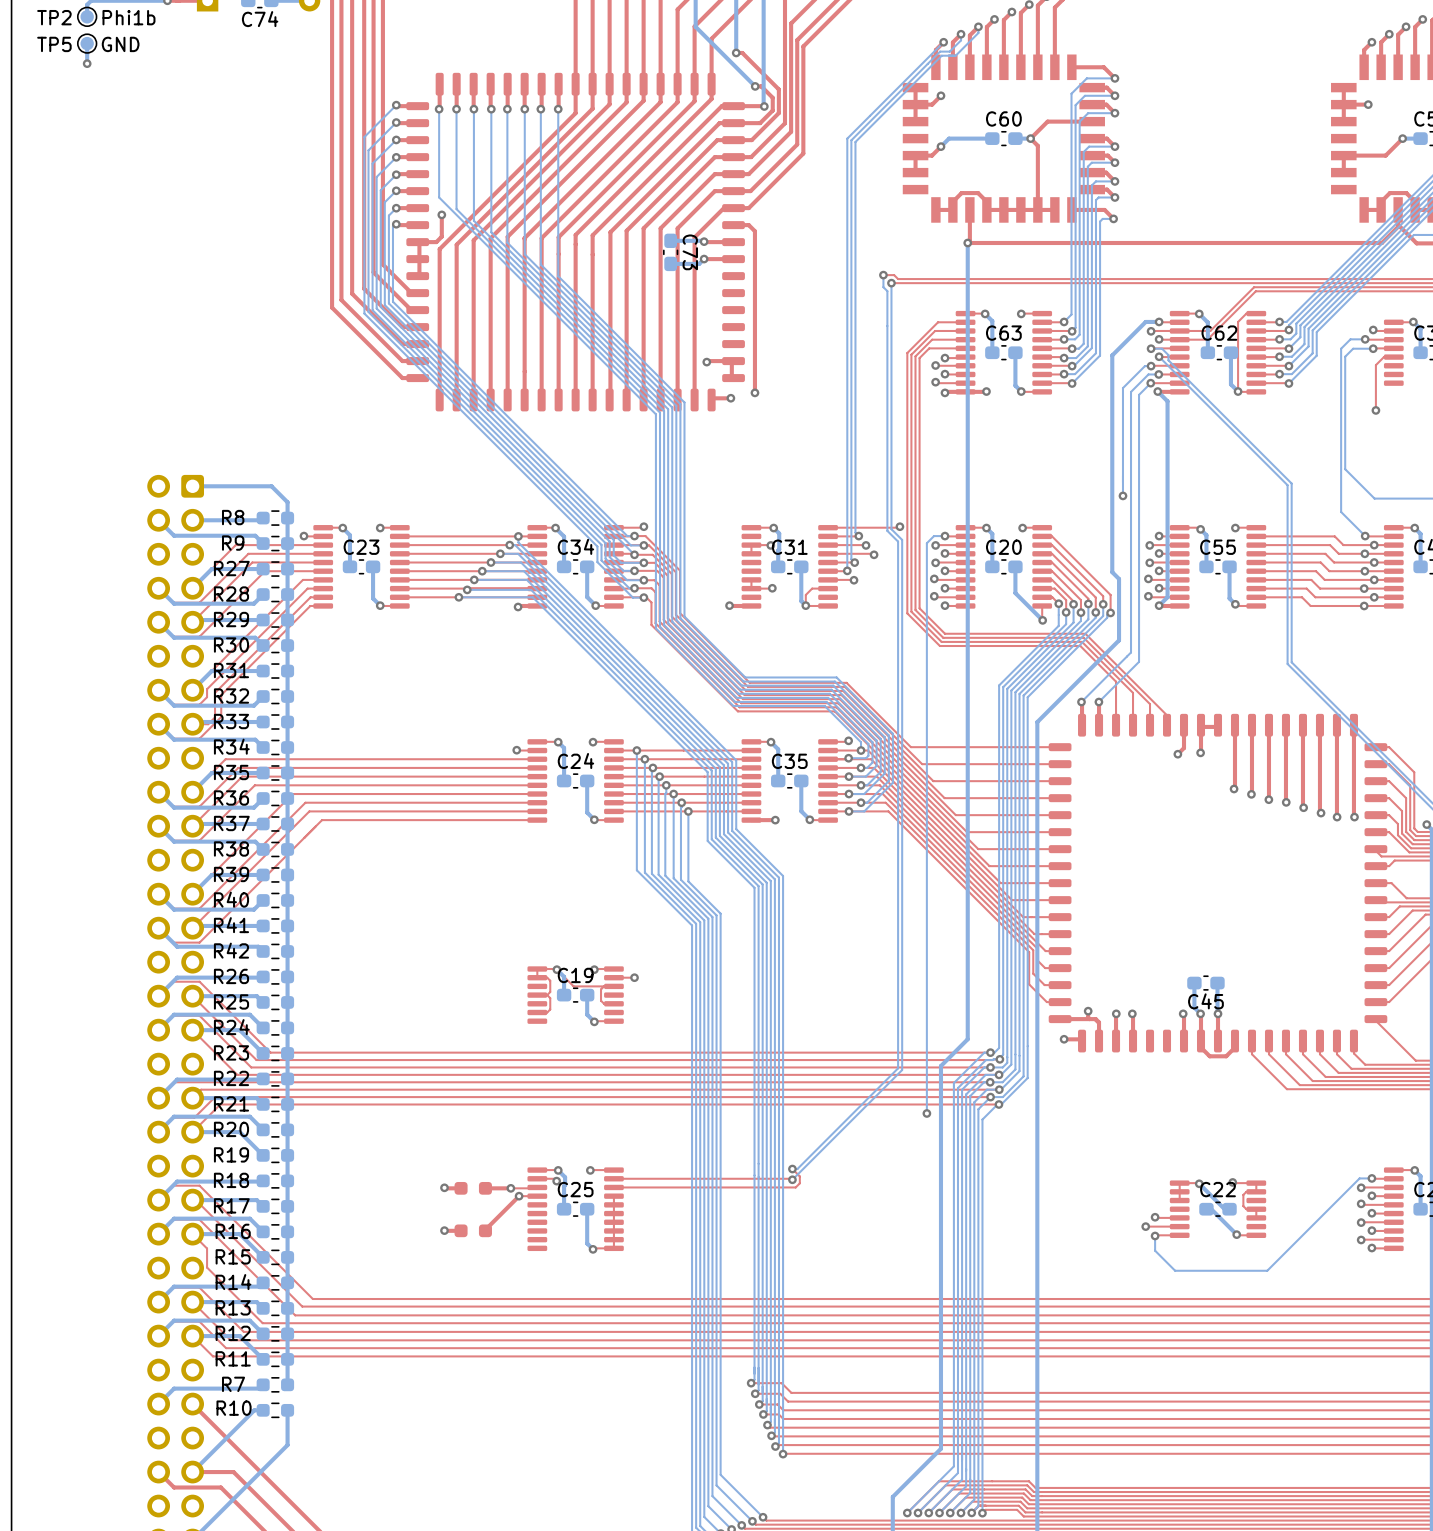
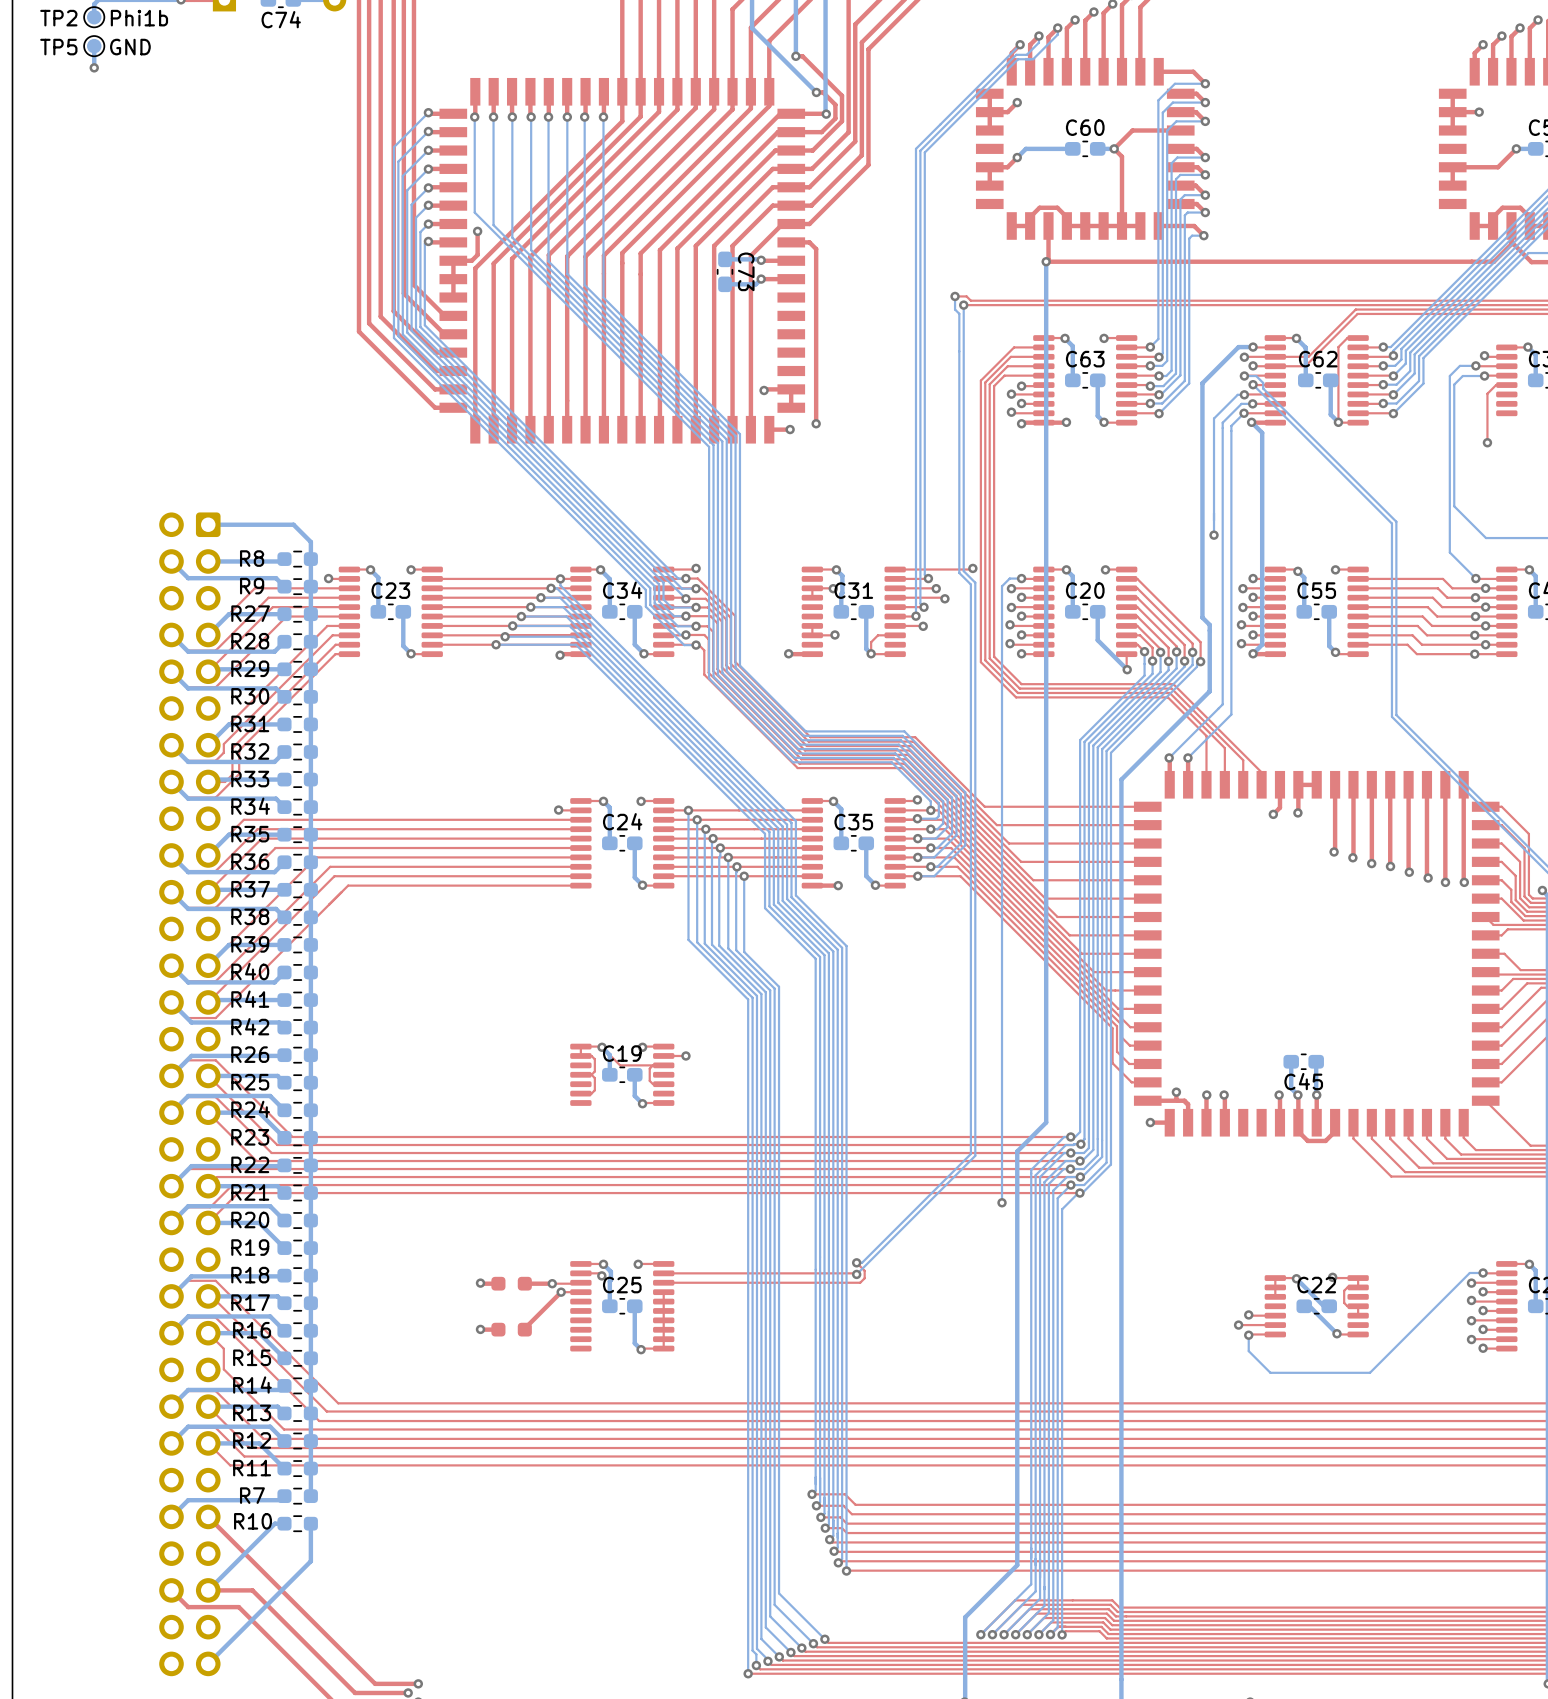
part footprint: [406, 72, 745, 412] -> [439, 77, 806, 444]
part footprint: [1048, 713, 1388, 1053] -> [1133, 770, 1500, 1137]

